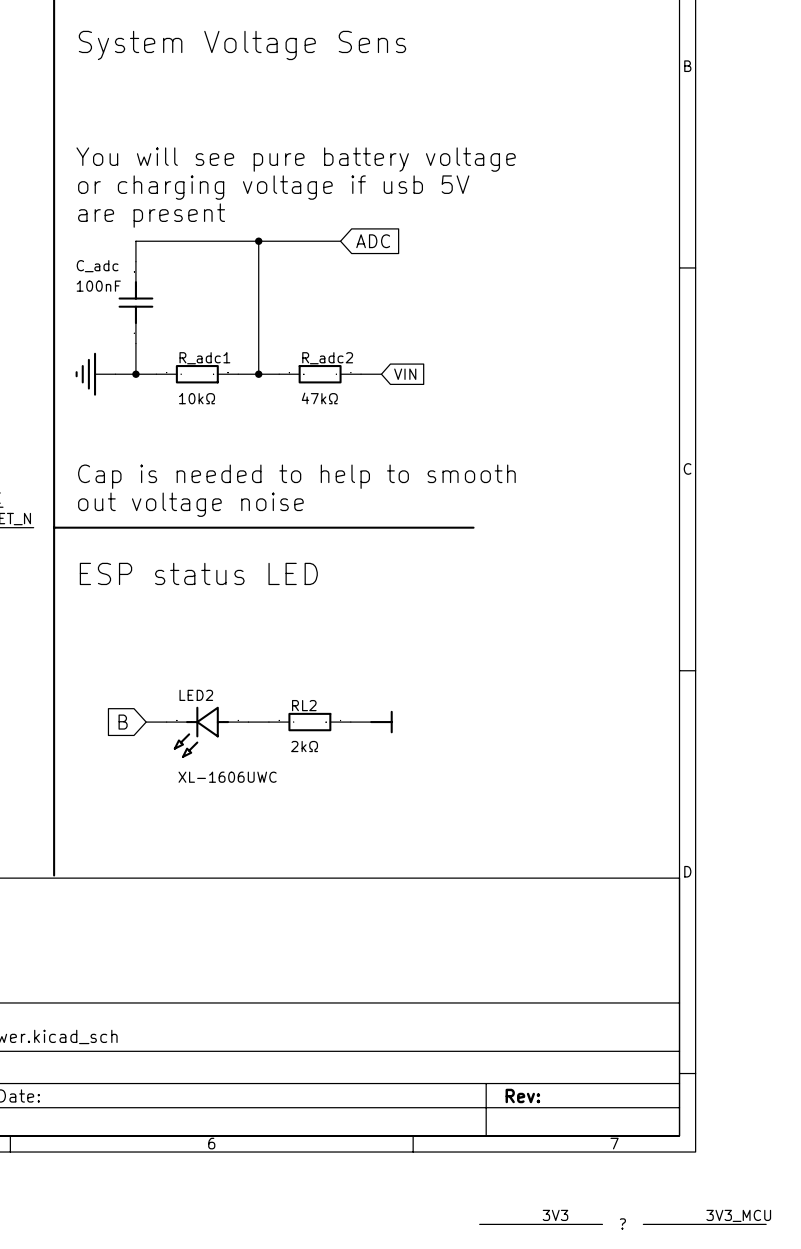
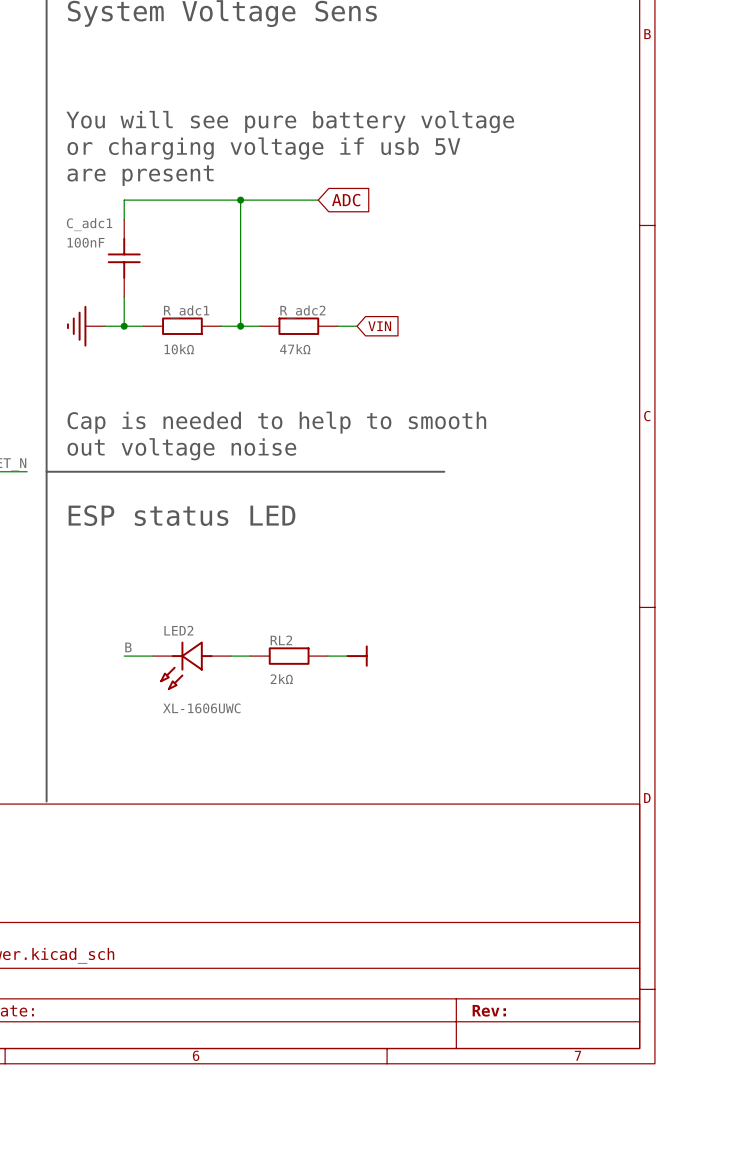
C_adc name: C_adc (97, 266) -> C_adc1 (89, 224)
label: none -> B (128, 647)
global label: B (123, 722) -> none
wire: none -> (124, 656) (133, 656)
label: 3V3 (555, 1215) -> none
label: 3V3_MCU (738, 1215) -> none
wire: (479, 1224) (602, 1224) -> none
part: (622, 1224) -> none
wire: (643, 1224) (766, 1224) -> none

